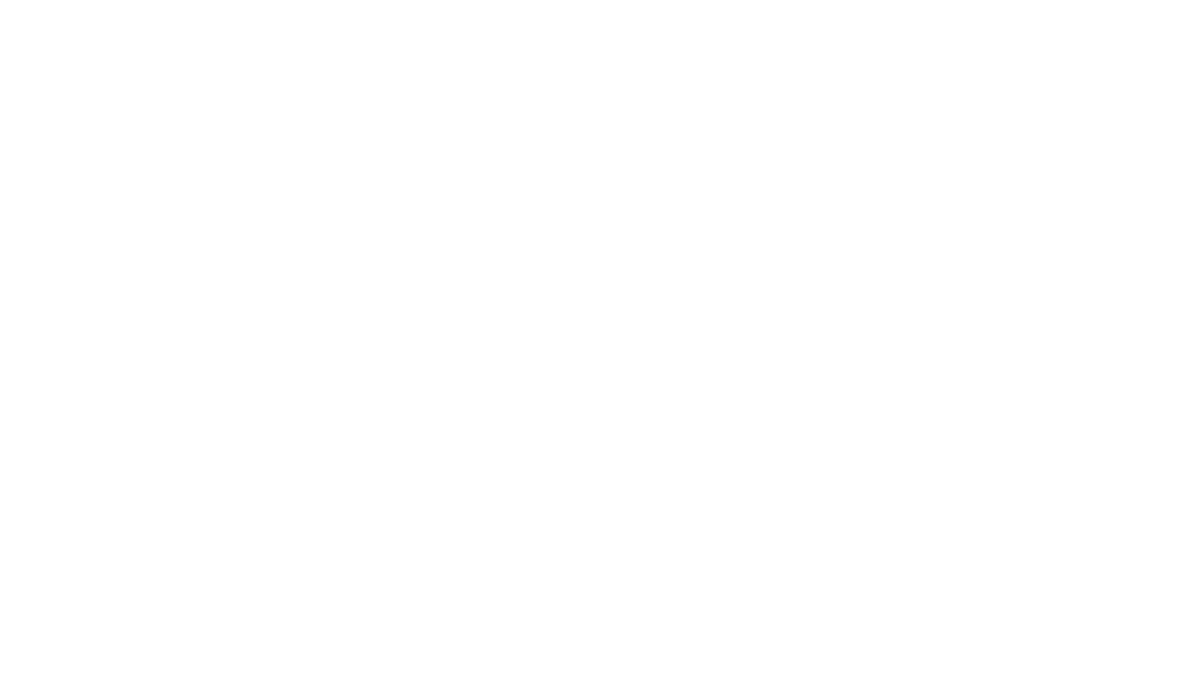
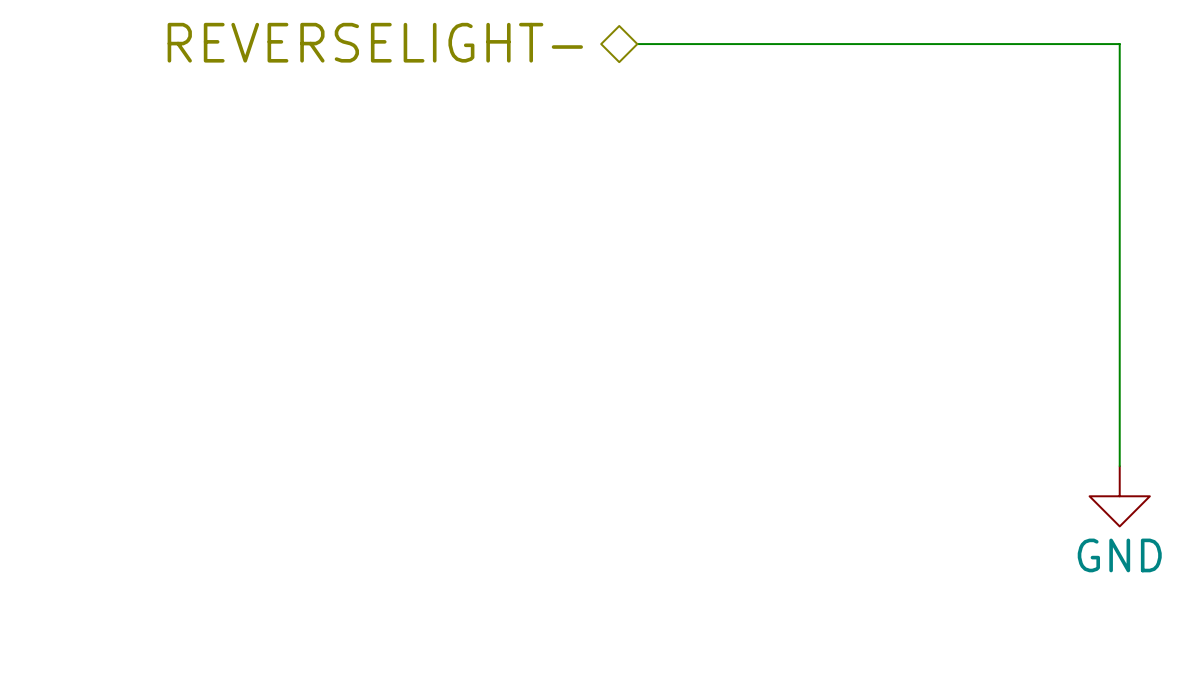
hierarchical label: none -> REVERSELIGHT- (375, 42)
wire: none -> (637, 44) (1119, 44) (1119, 466)
power symbol: none -> GND (1119, 496)

